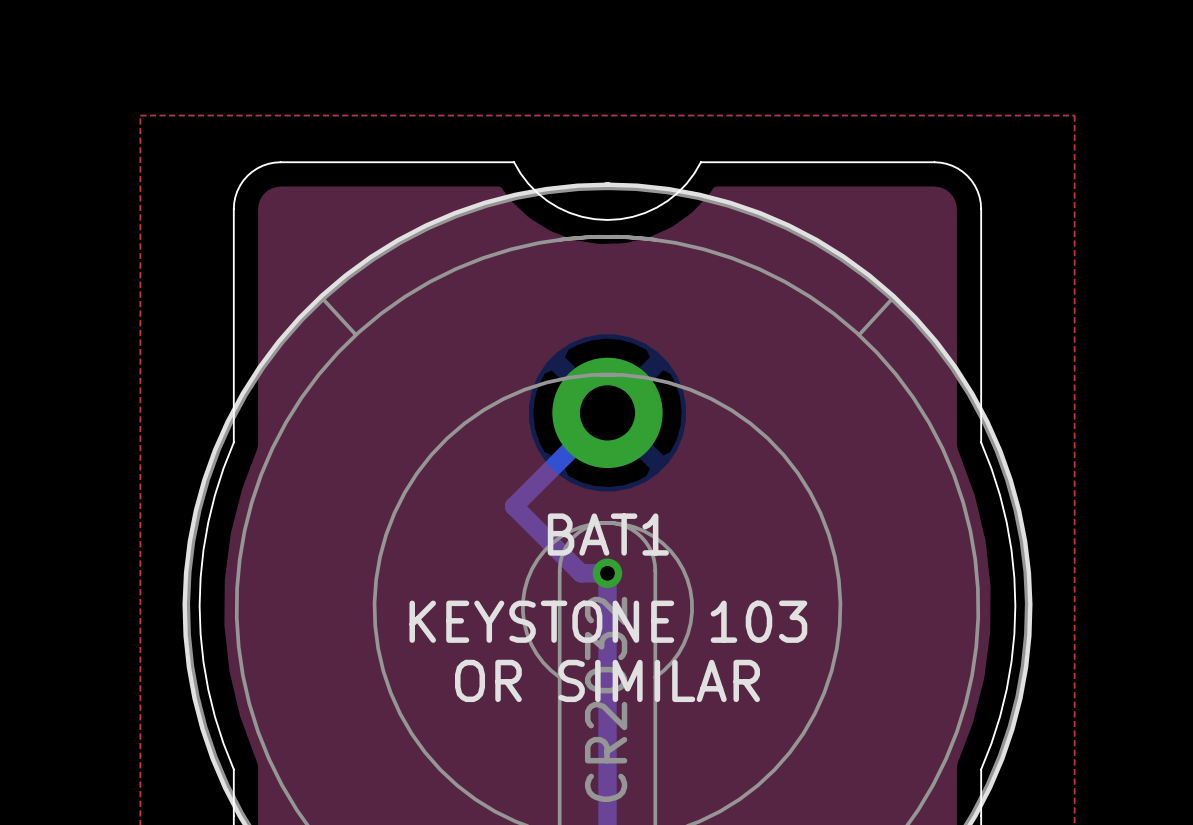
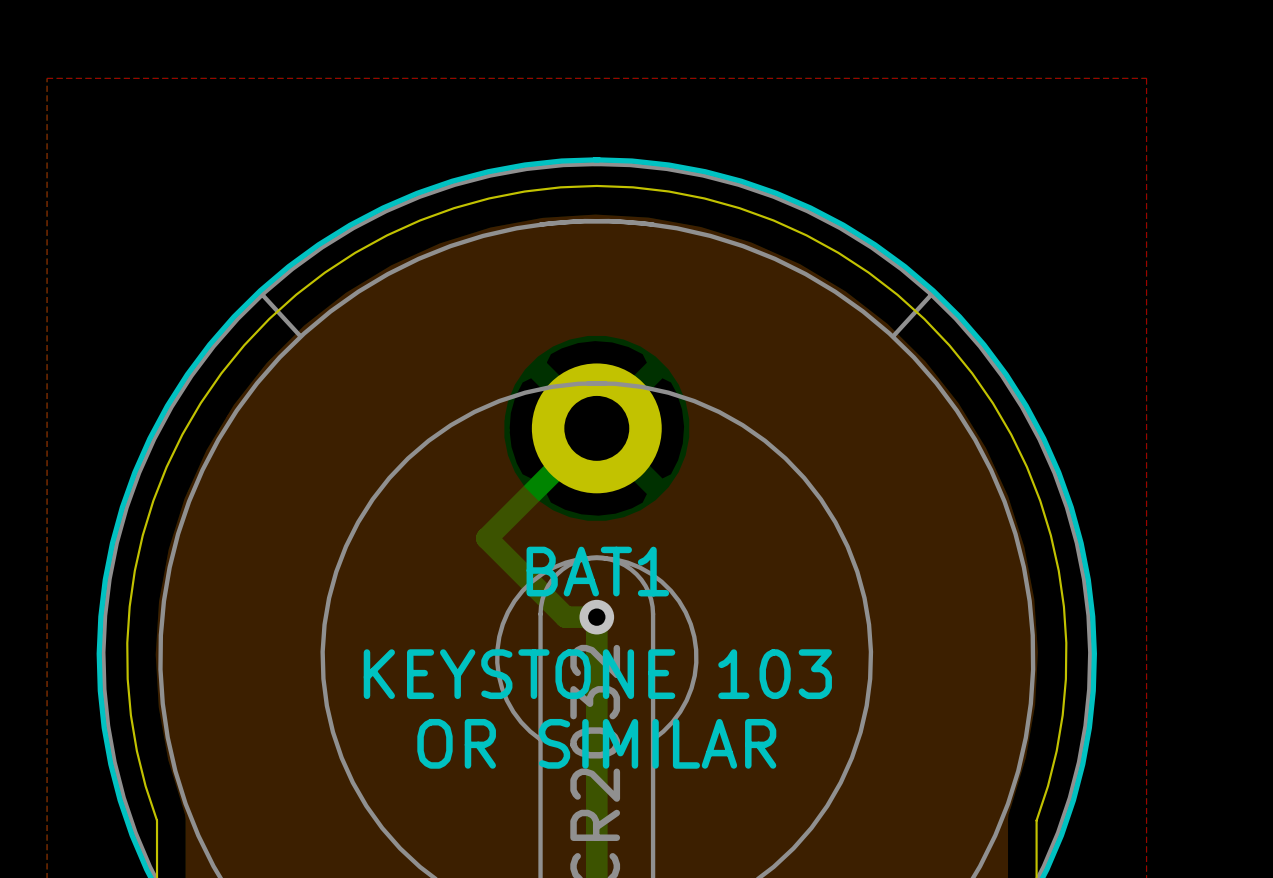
board edge: none -> (157, 820) (157, 848)
board edge: (233, 769) (223, 743) (208, 689) (200, 634) (200, 577) (203, 550) (214, 495) (233, 442) (234, 202) (237, 191) (247, 175) (262, 165) (280, 162) (514, 162) (528, 183) (537, 192) (558, 207) (582, 216) (607, 219) (632, 216) (656, 207) (667, 200) (686, 183) (700, 162) (934, 162) (952, 165) (962, 171) (974, 185) (980, 202) (981, 442) (1000, 495) (1006, 522) (1011, 550) (1015, 605) (1011, 661) (1006, 689) (1000, 716) (981, 769) -> (157, 820) (145, 786) (130, 715) (127, 642) (129, 606) (142, 535) (153, 500) (166, 467) (200, 403) (244, 345) (296, 294) (324, 272) (386, 235) (454, 208) (489, 198) (560, 187) (596, 185) (633, 187) (704, 198) (773, 220) (806, 235) (868, 272) (924, 319) (972, 373) (992, 403) (1011, 434) (1040, 500) (1058, 570) (1063, 606) (1065, 679) (1062, 715) (1047, 786) (1036, 820) (1036, 848)

